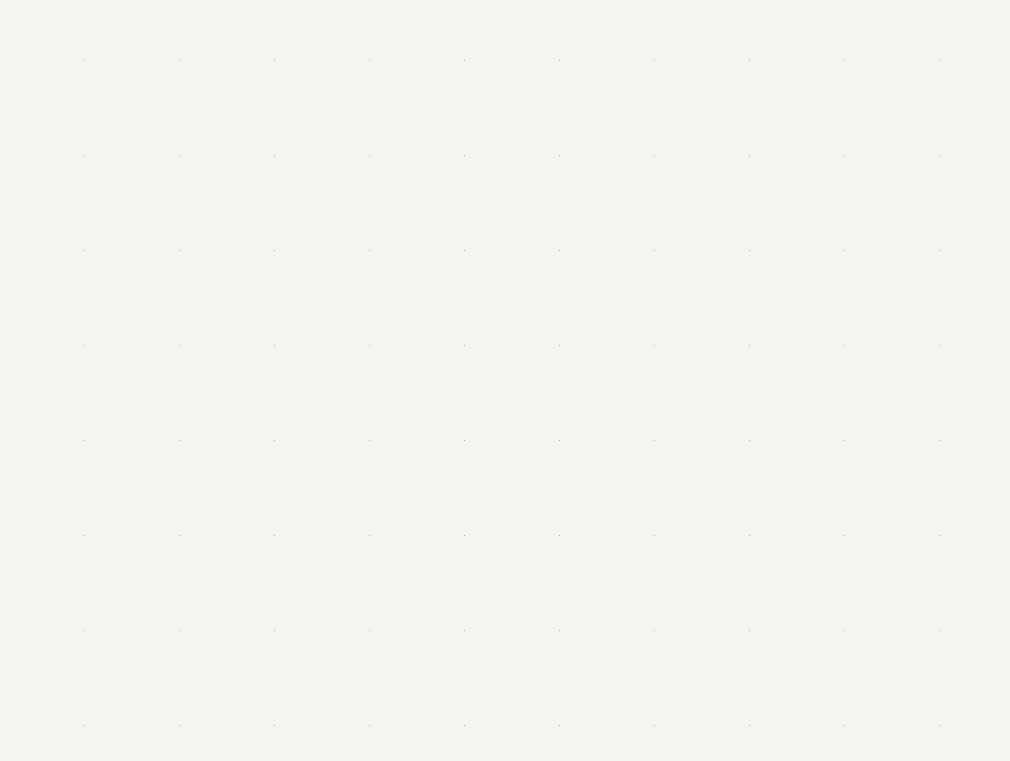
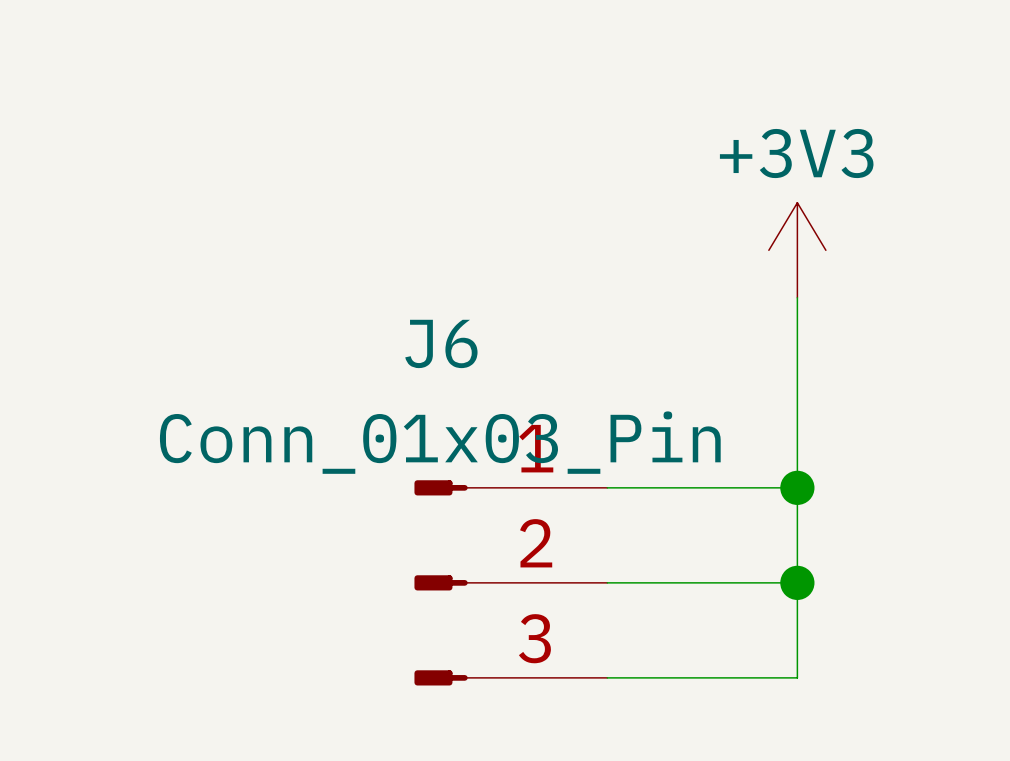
power symbol: none -> +3V3 (797, 250)
wire: none -> (797, 297) (797, 677) (607, 677)
wire: none -> (607, 487) (797, 487)
junction: none -> (797, 487)
J6: none -> Conn_01x03_Pin (510, 582)
wire: none -> (607, 582) (797, 582)
junction: none -> (797, 582)

